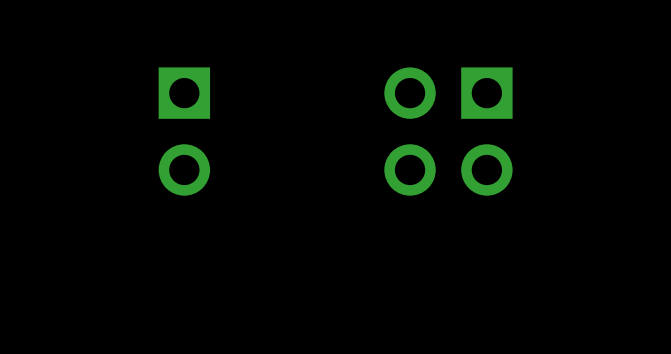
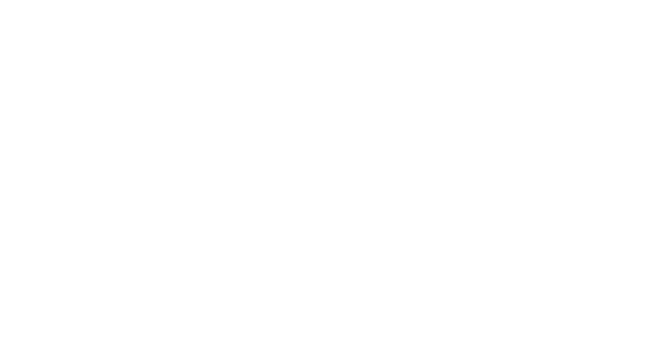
part: (184, 131) -> none
part: (448, 131) -> none

